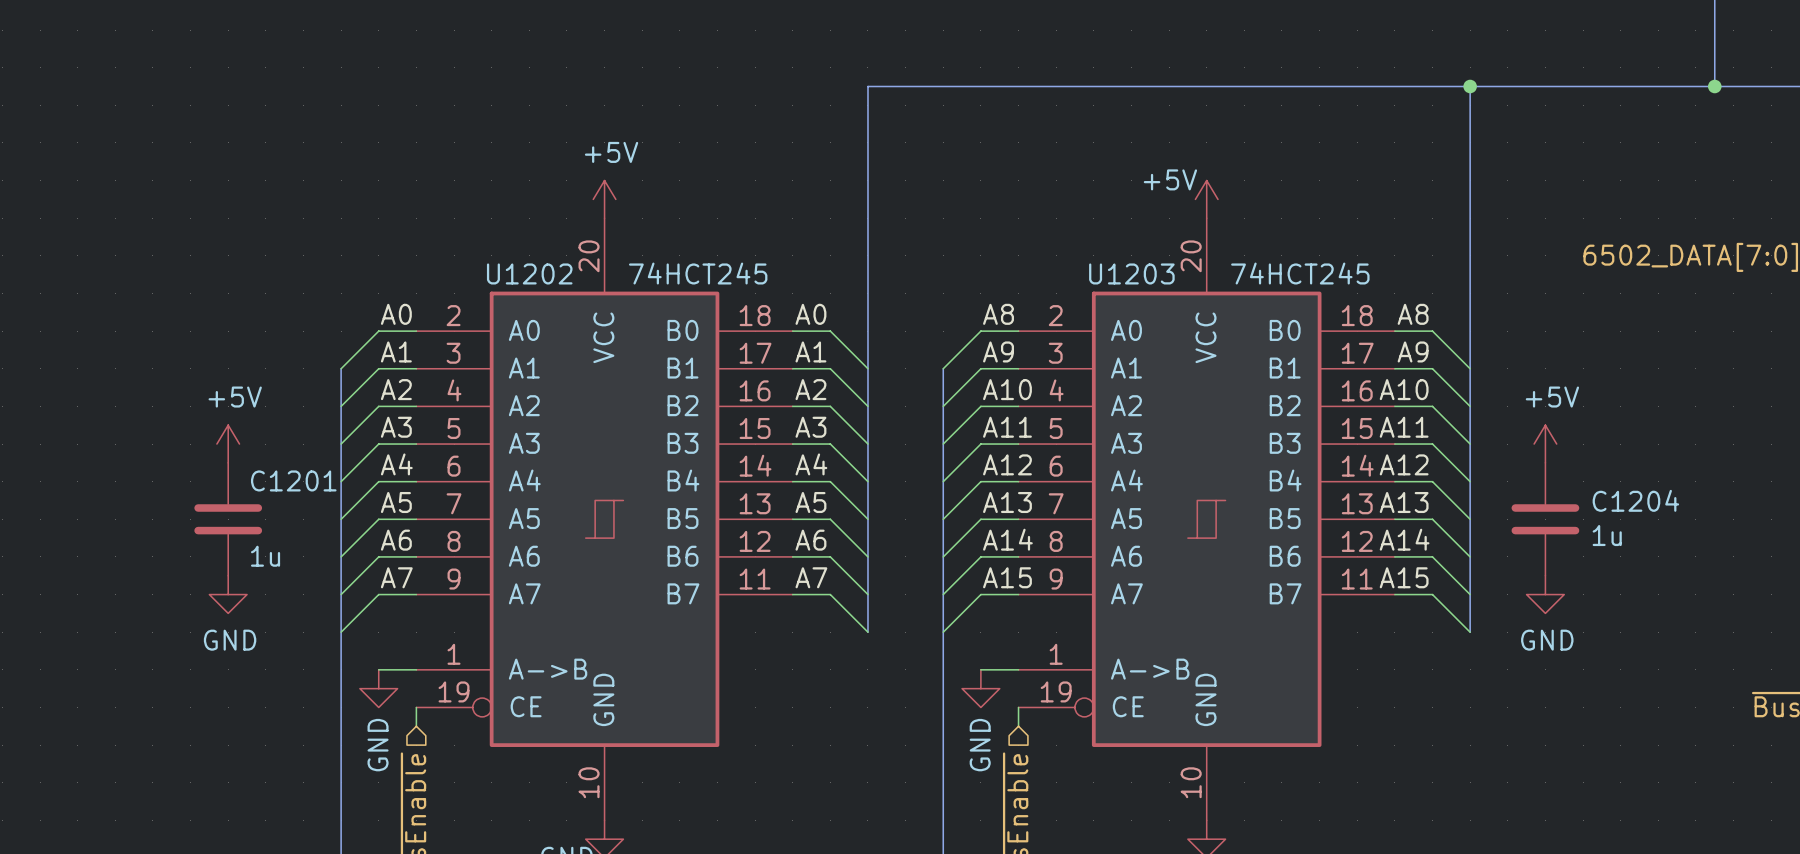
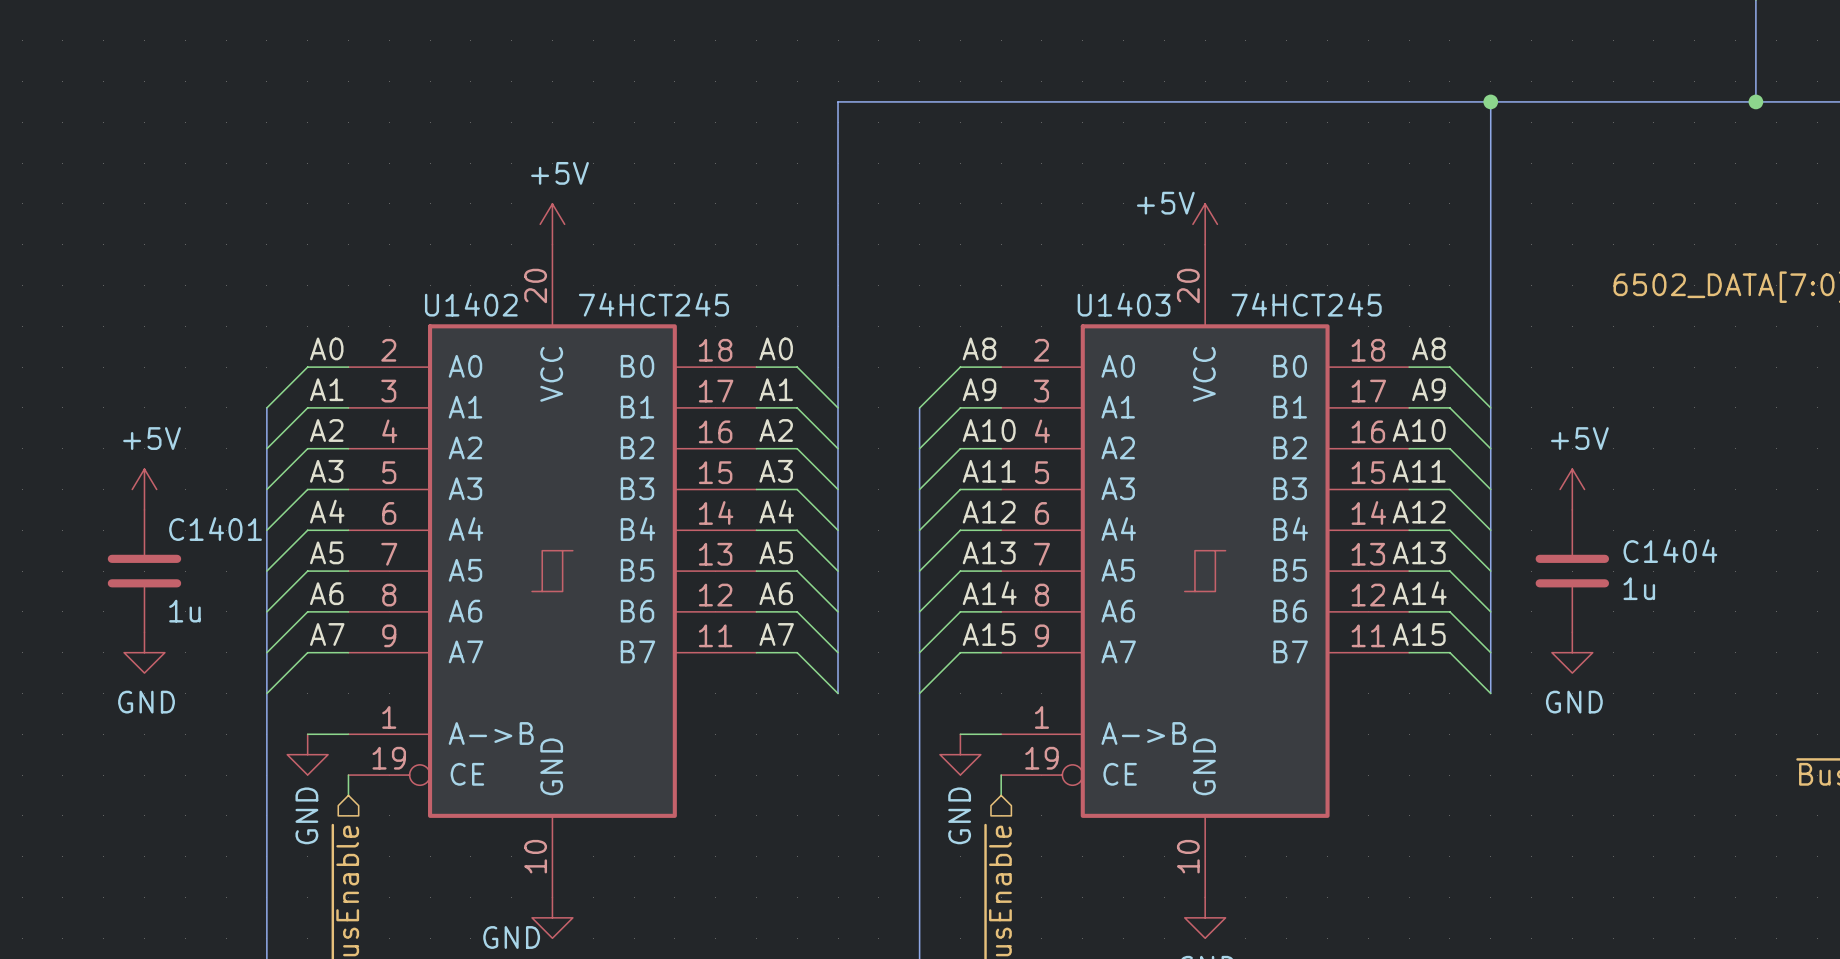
U1202 name: U1202 (529, 273) -> U1402 (471, 304)
U1203 name: U1203 (1131, 273) -> U1403 (1124, 304)
C1201 name: C1201 (293, 480) -> C1401 (215, 529)
C1204 name: C1204 (1635, 500) -> C1404 (1670, 551)

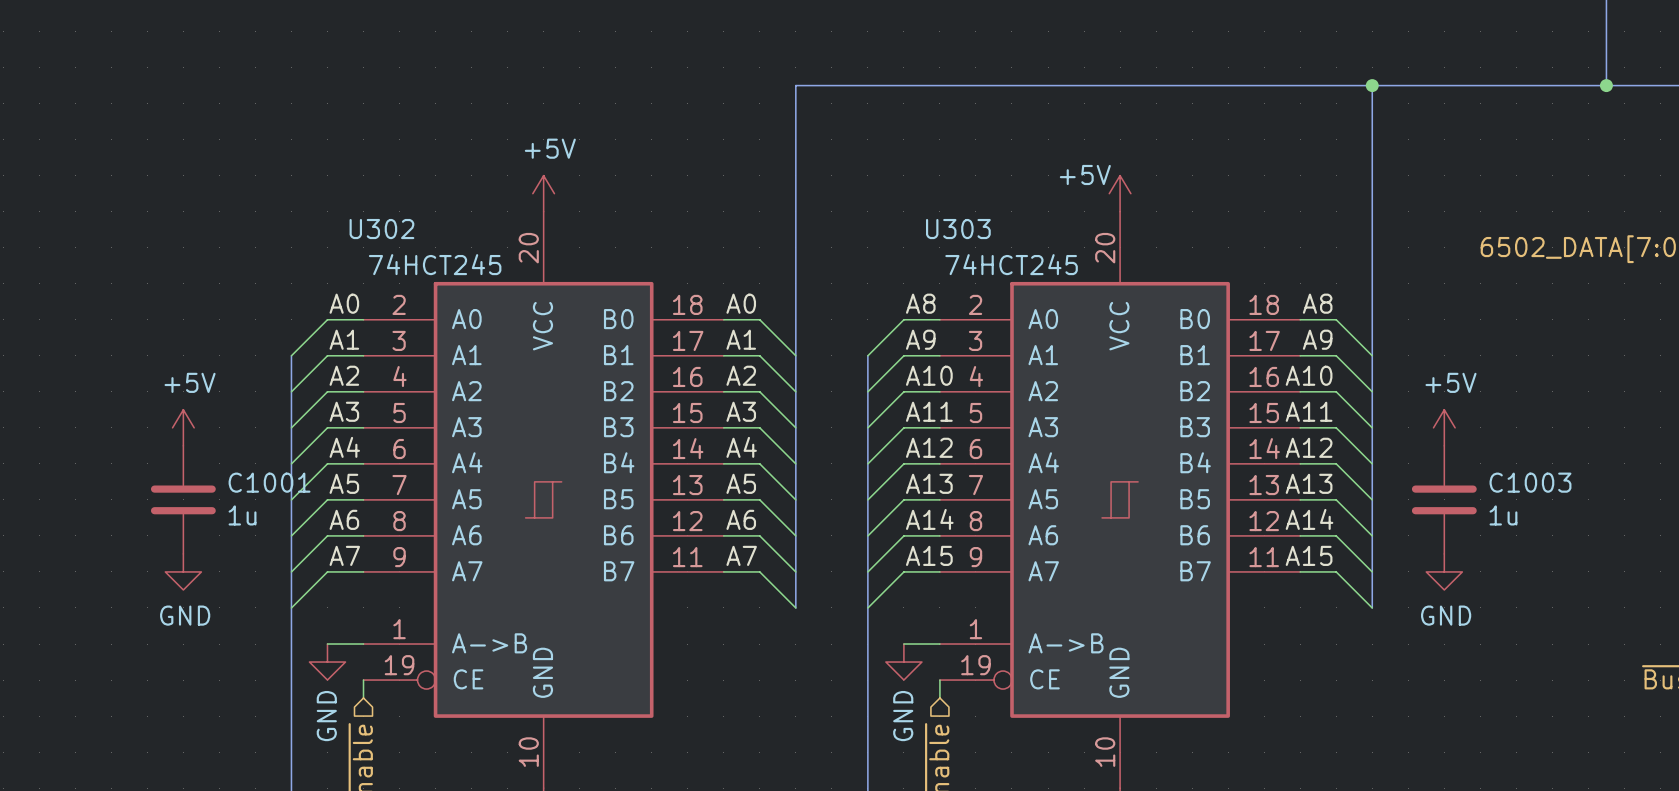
U1402 name: U1402 (471, 304) -> U302 (381, 229)
U1402 value position: 74HCT245 (653, 304) -> 74HCT245 (435, 264)
U1403 name: U1403 (1124, 304) -> U303 (958, 229)
U1403 value position: 74HCT245 (1306, 304) -> 74HCT245 (1011, 264)
C1401 name: C1401 (215, 529) -> C1001 (269, 482)
C1404 name: C1404 (1670, 551) -> C1003 (1530, 482)
C1401 value position: 1u (184, 611) -> 1u (242, 515)

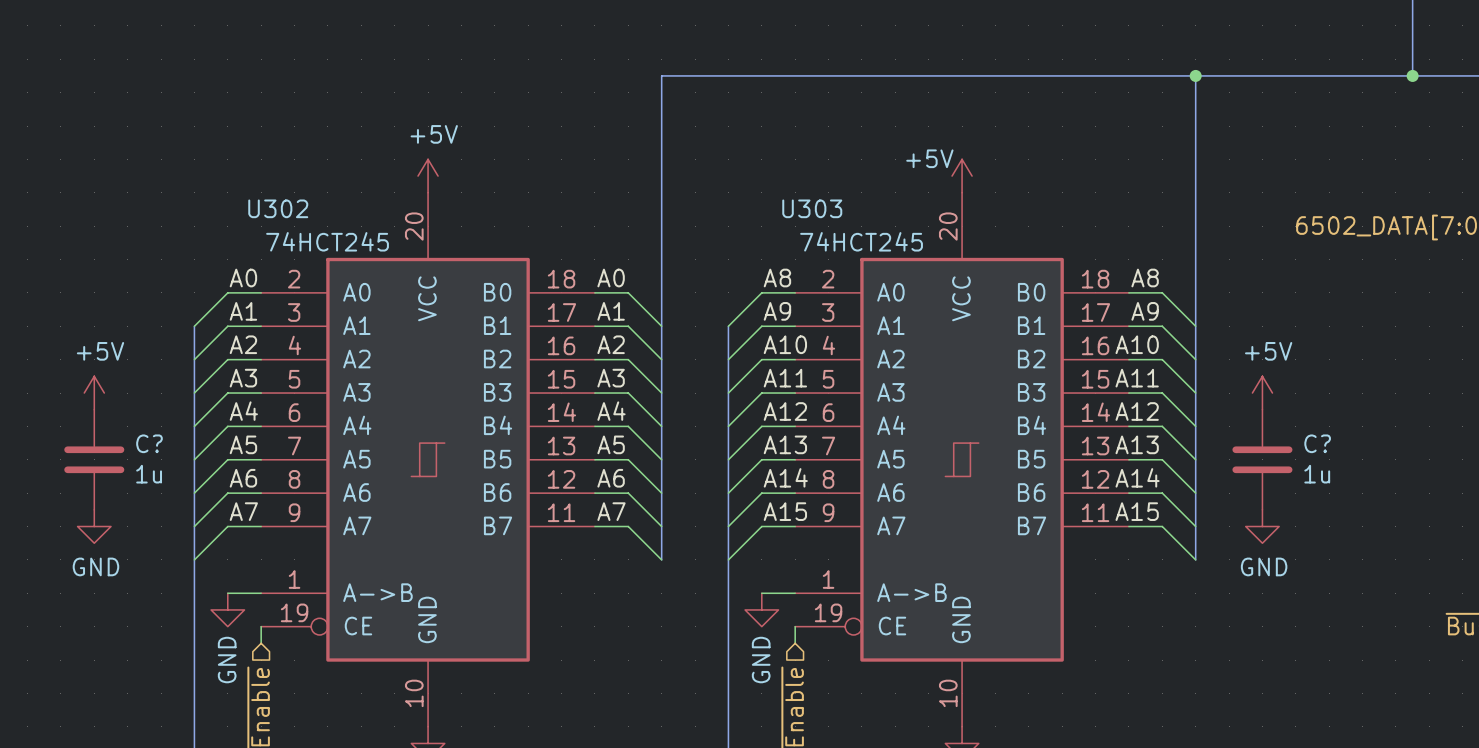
C1001 name: C1001 (269, 482) -> C? (149, 443)
C1003 name: C1003 (1530, 482) -> C? (1317, 443)

